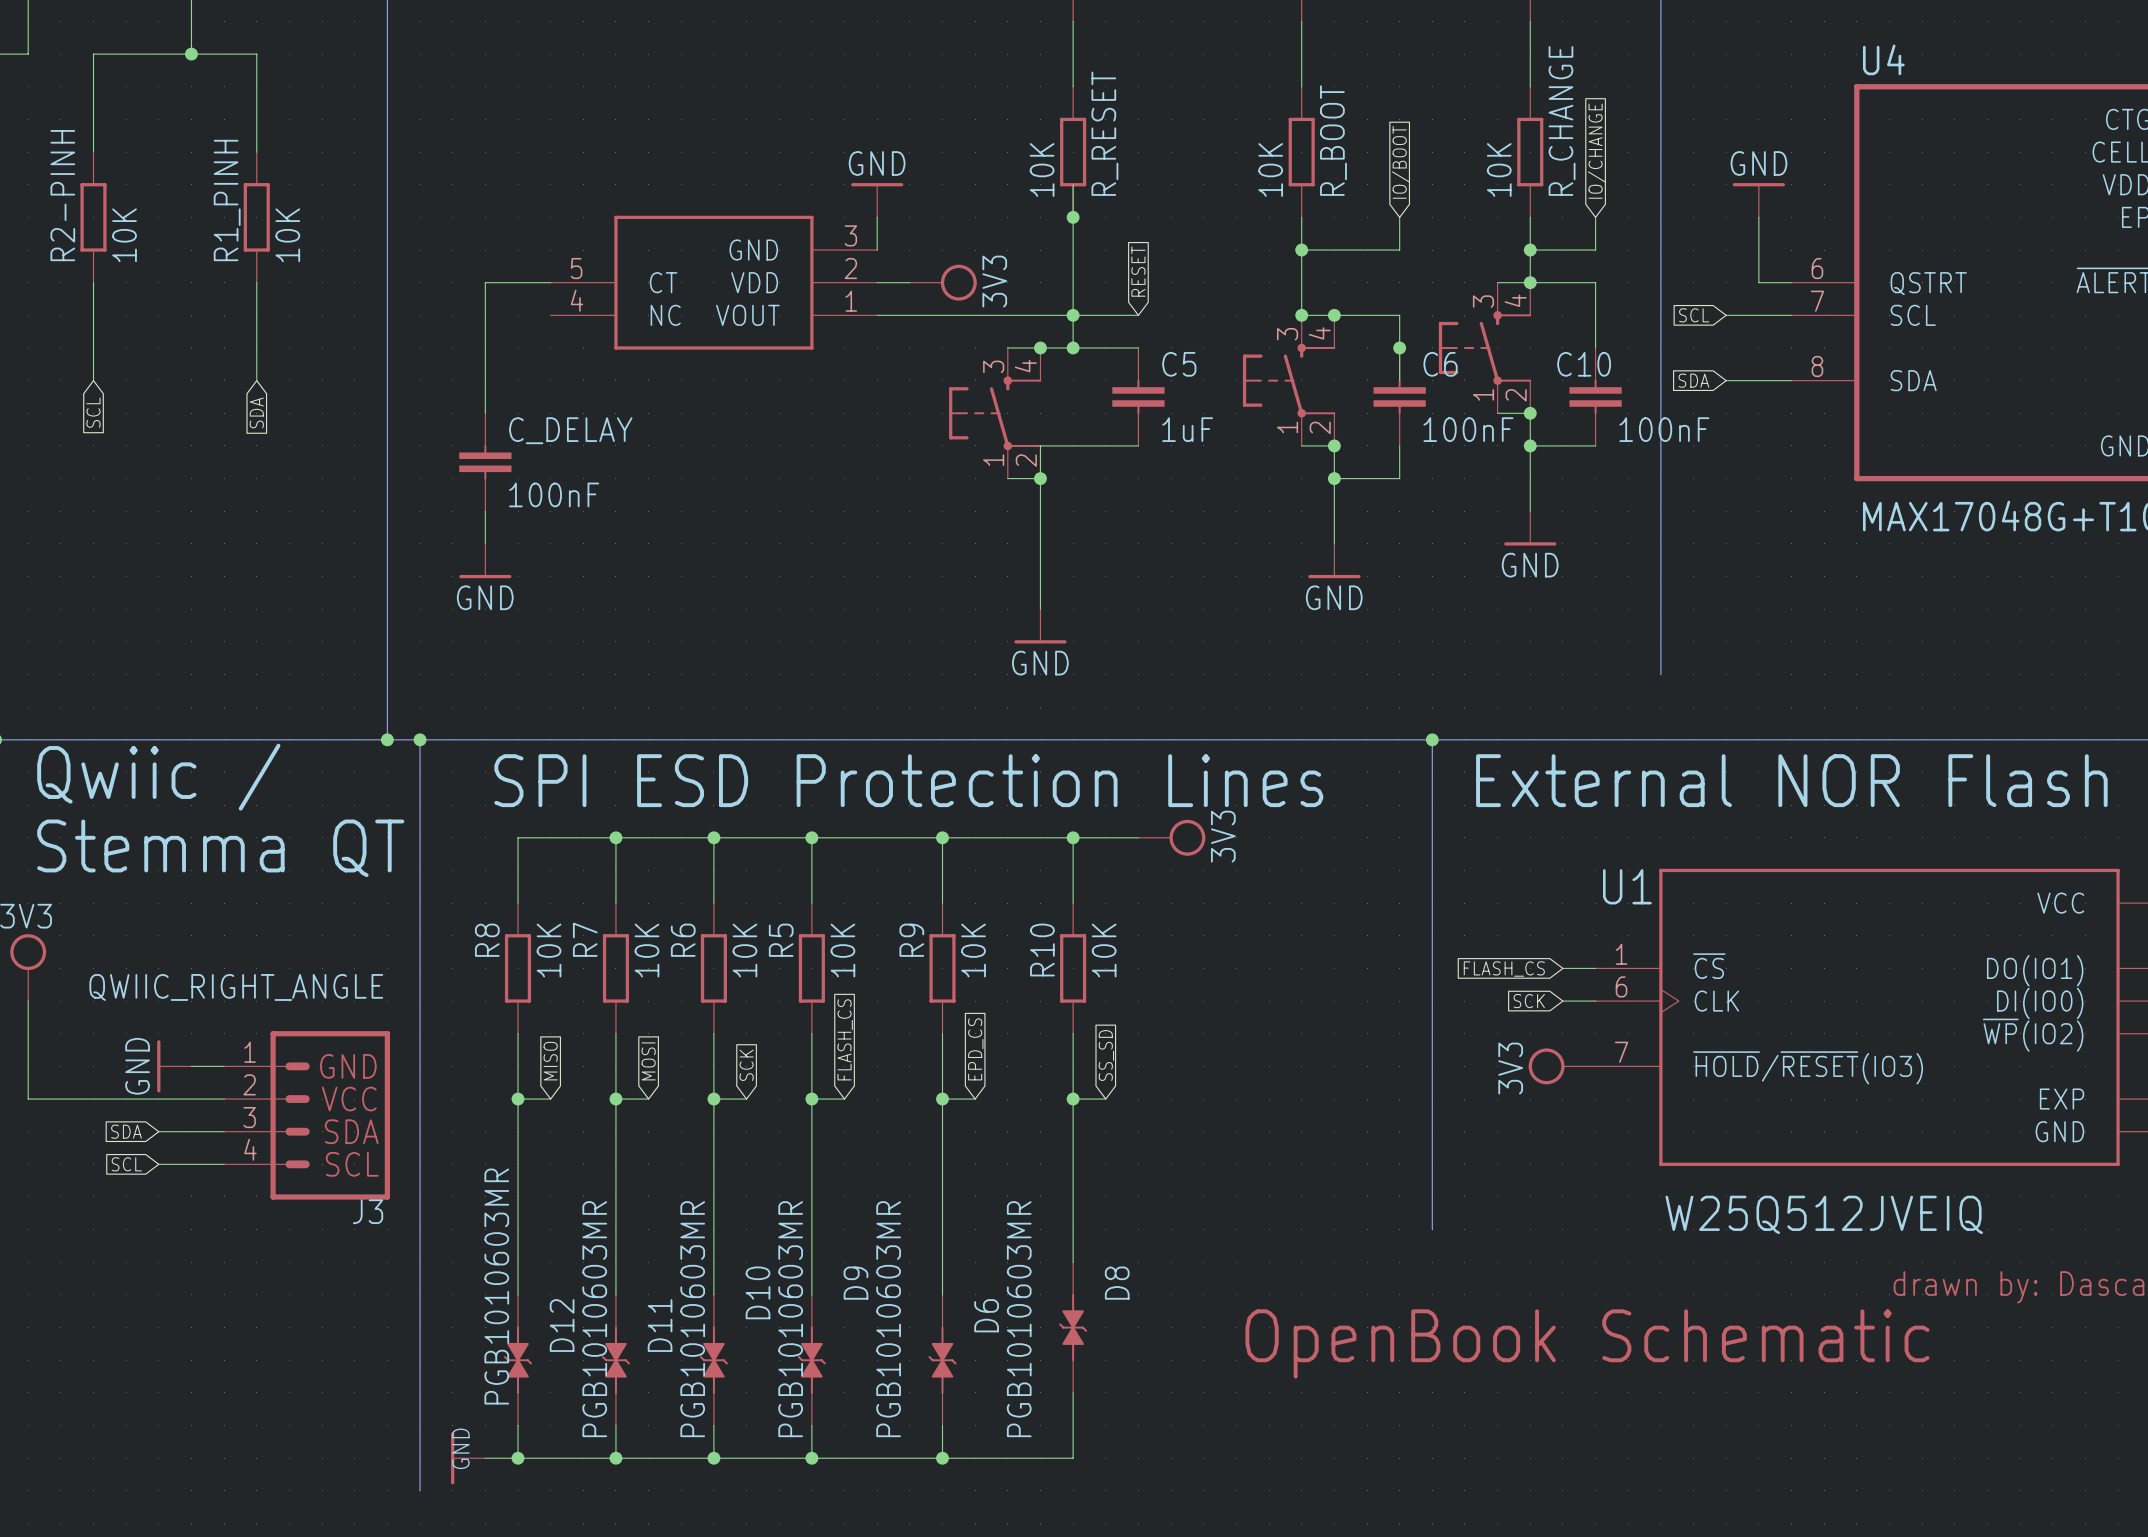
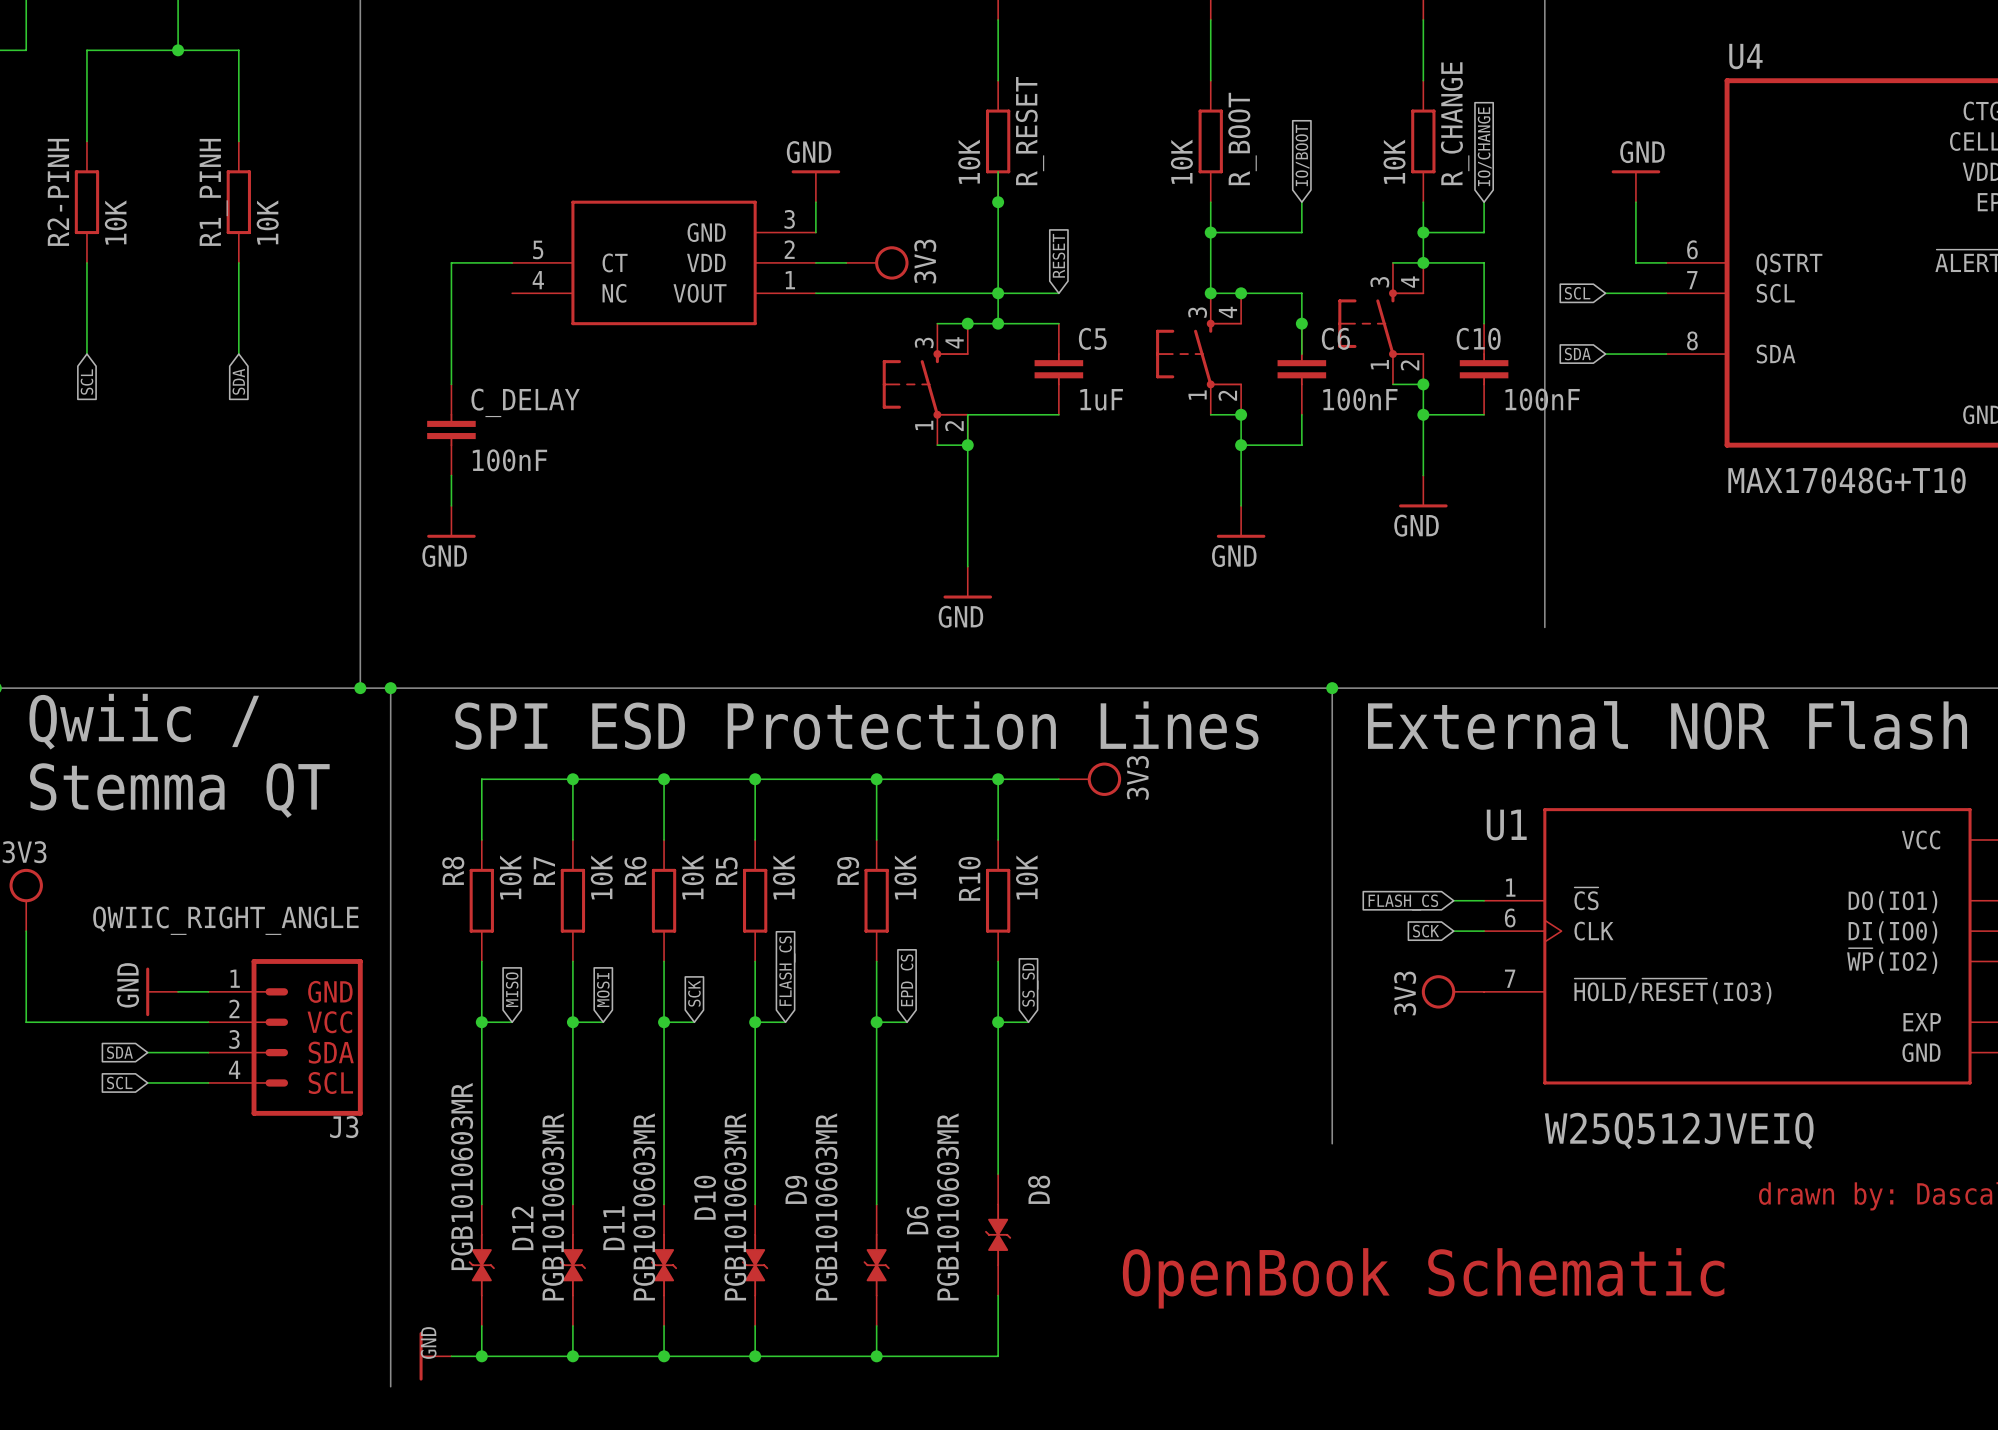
text position: OpenBook Schematic (1587, 1343) -> OpenBook Schematic (1423, 1278)

